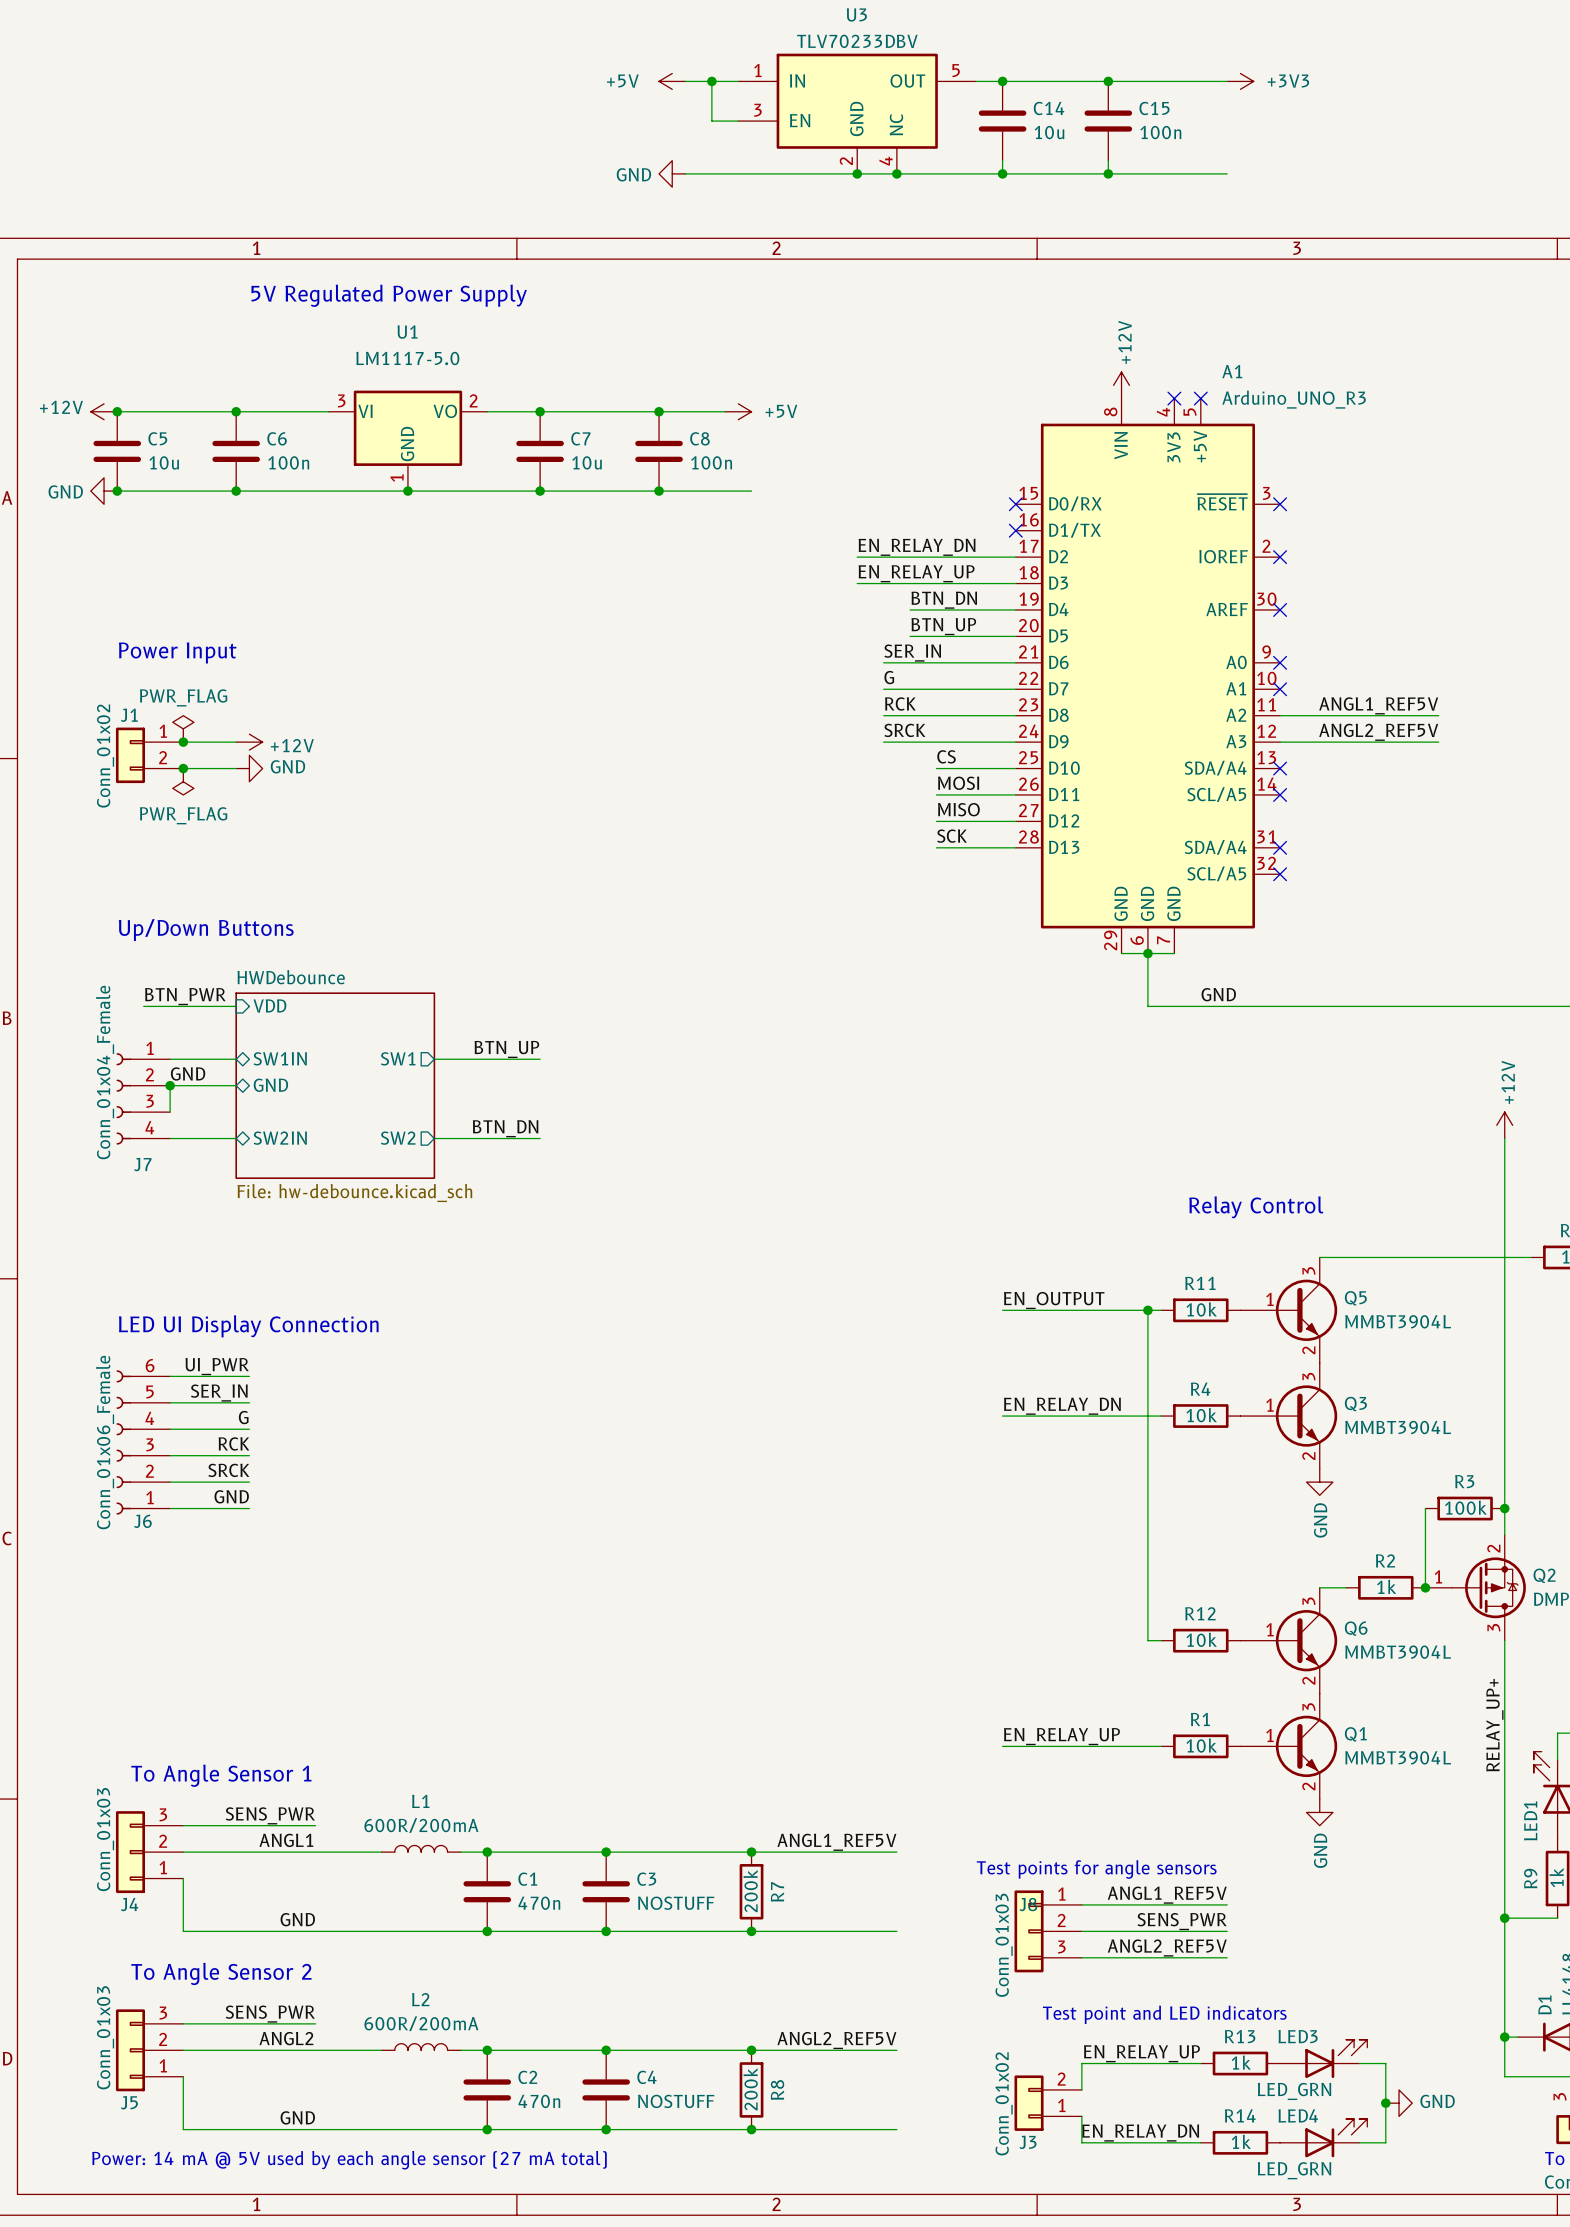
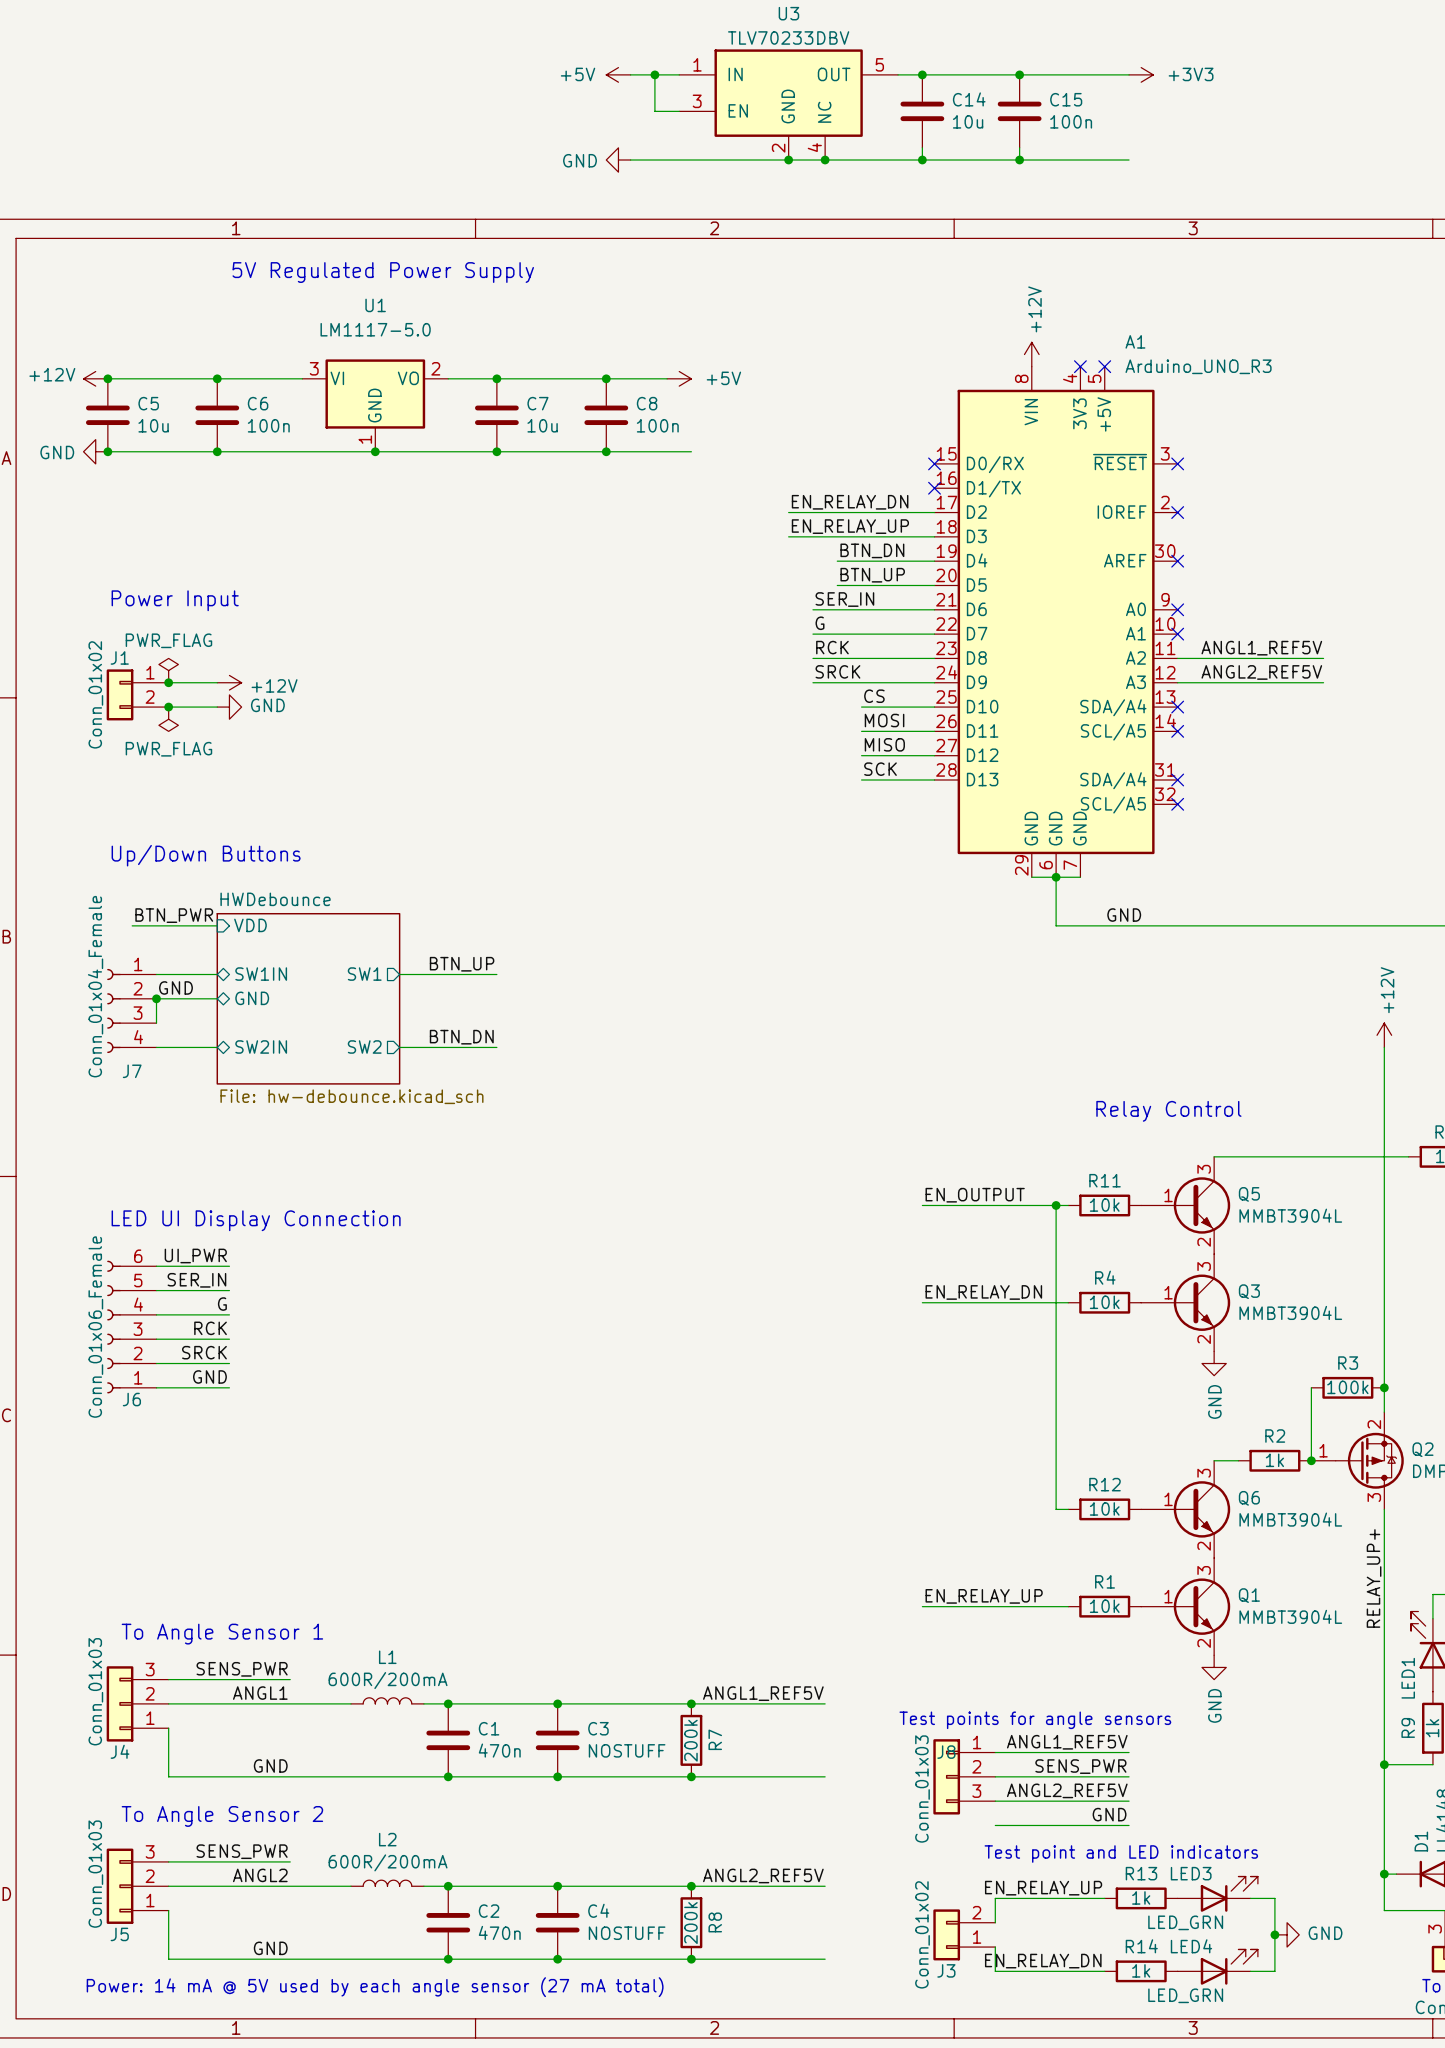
label: none -> GND (1109, 1814)
wire: none -> (995, 1825) (1129, 1825)
text position: Test point and LED indicators (1164, 2014) -> Test point and LED indicators (1121, 1854)

